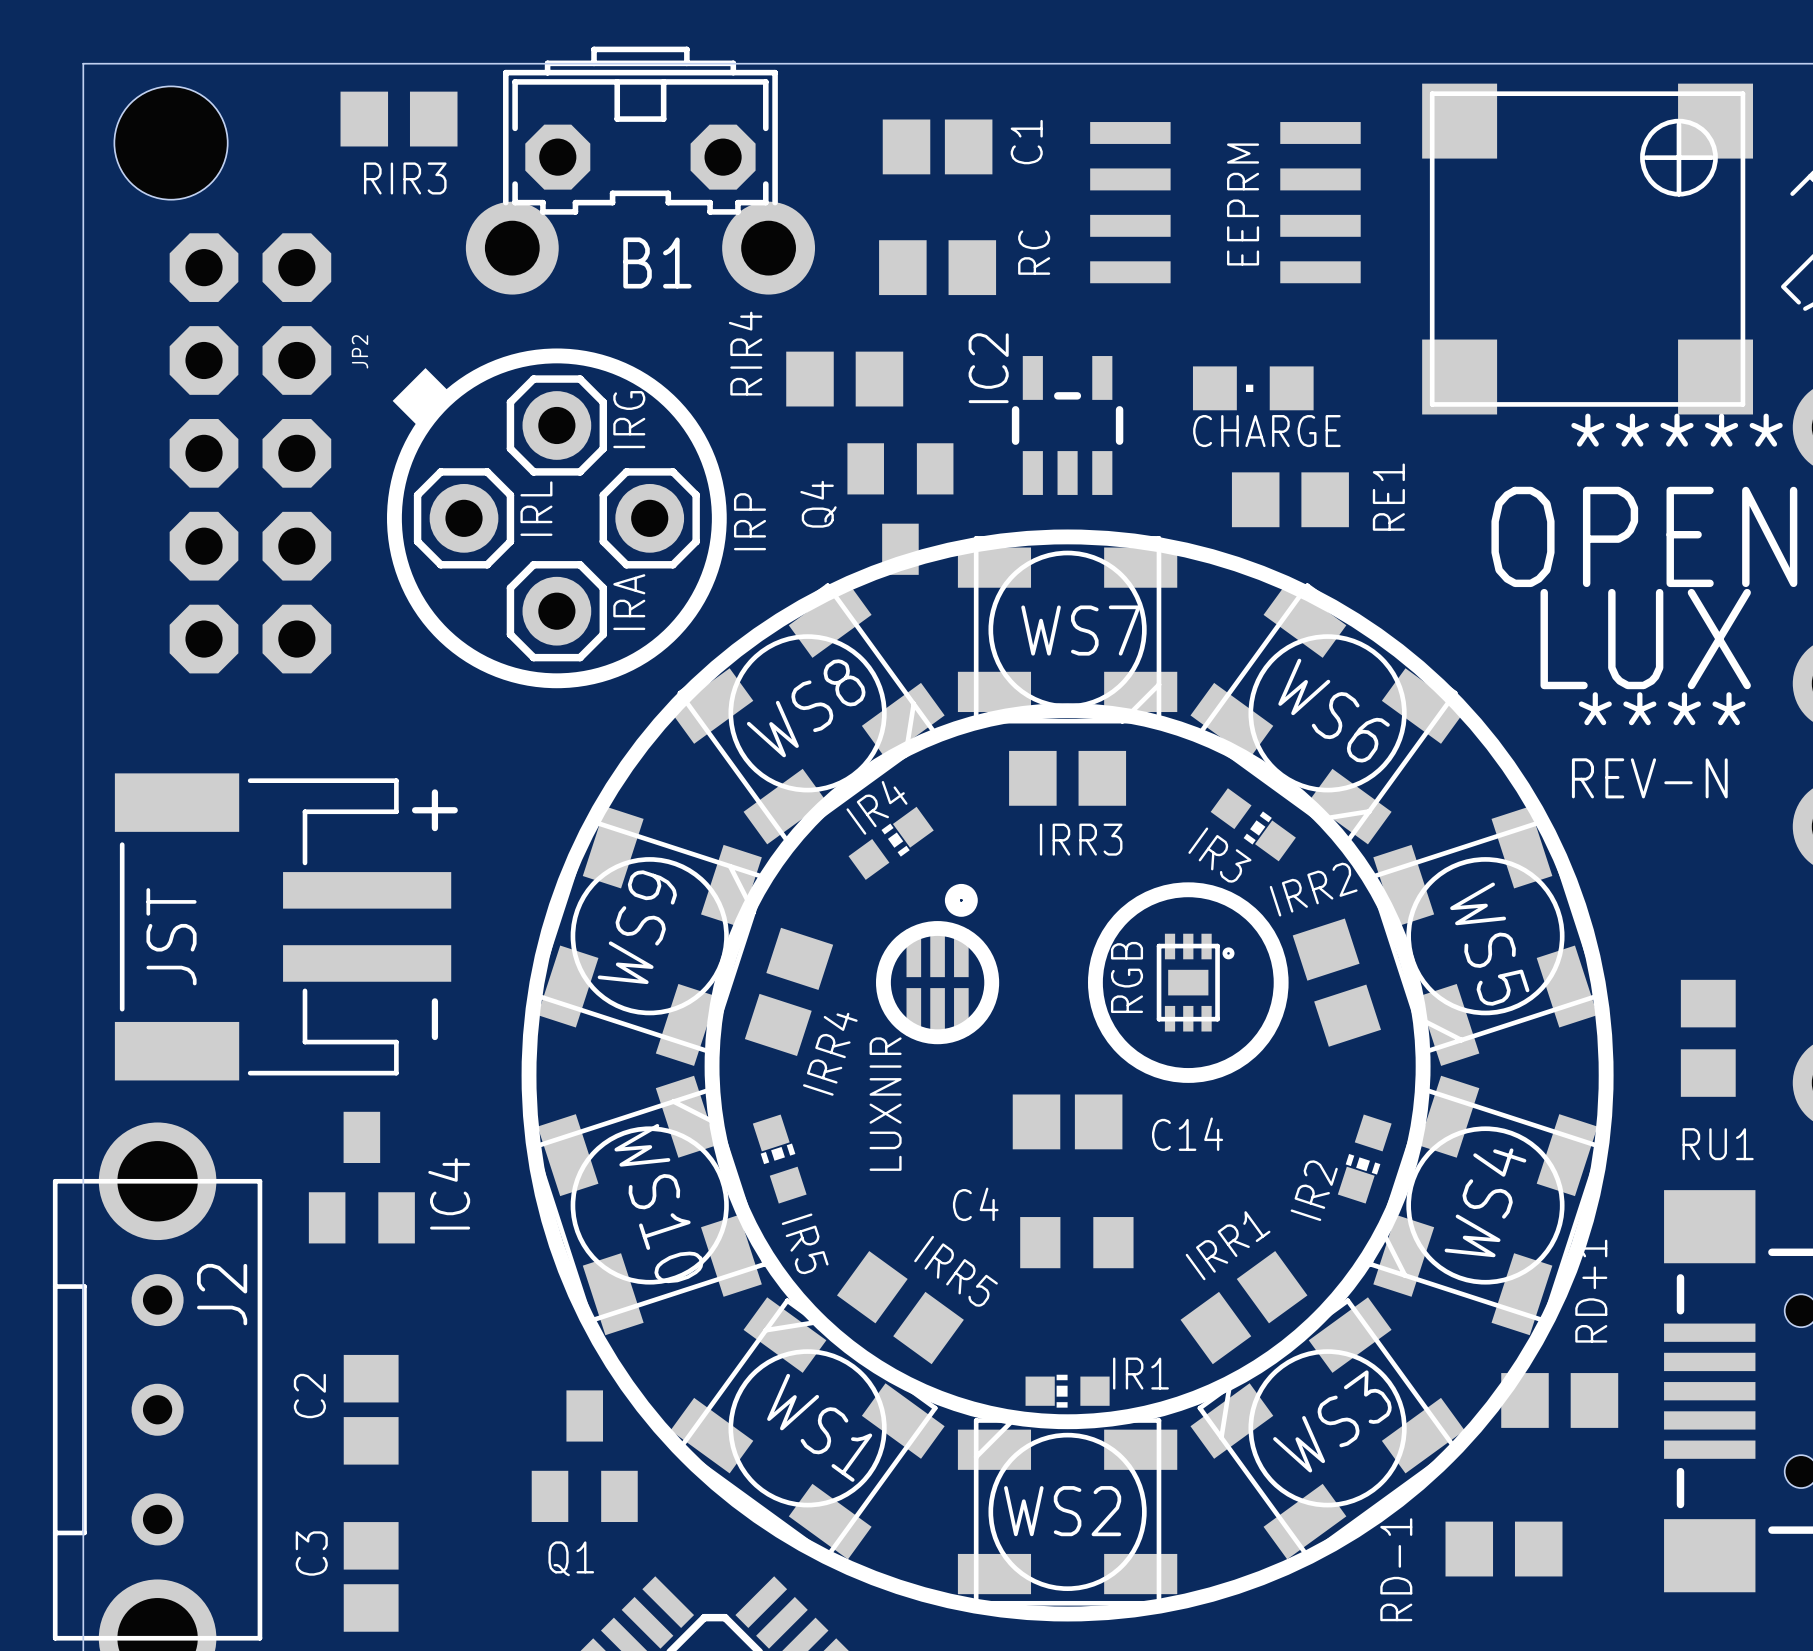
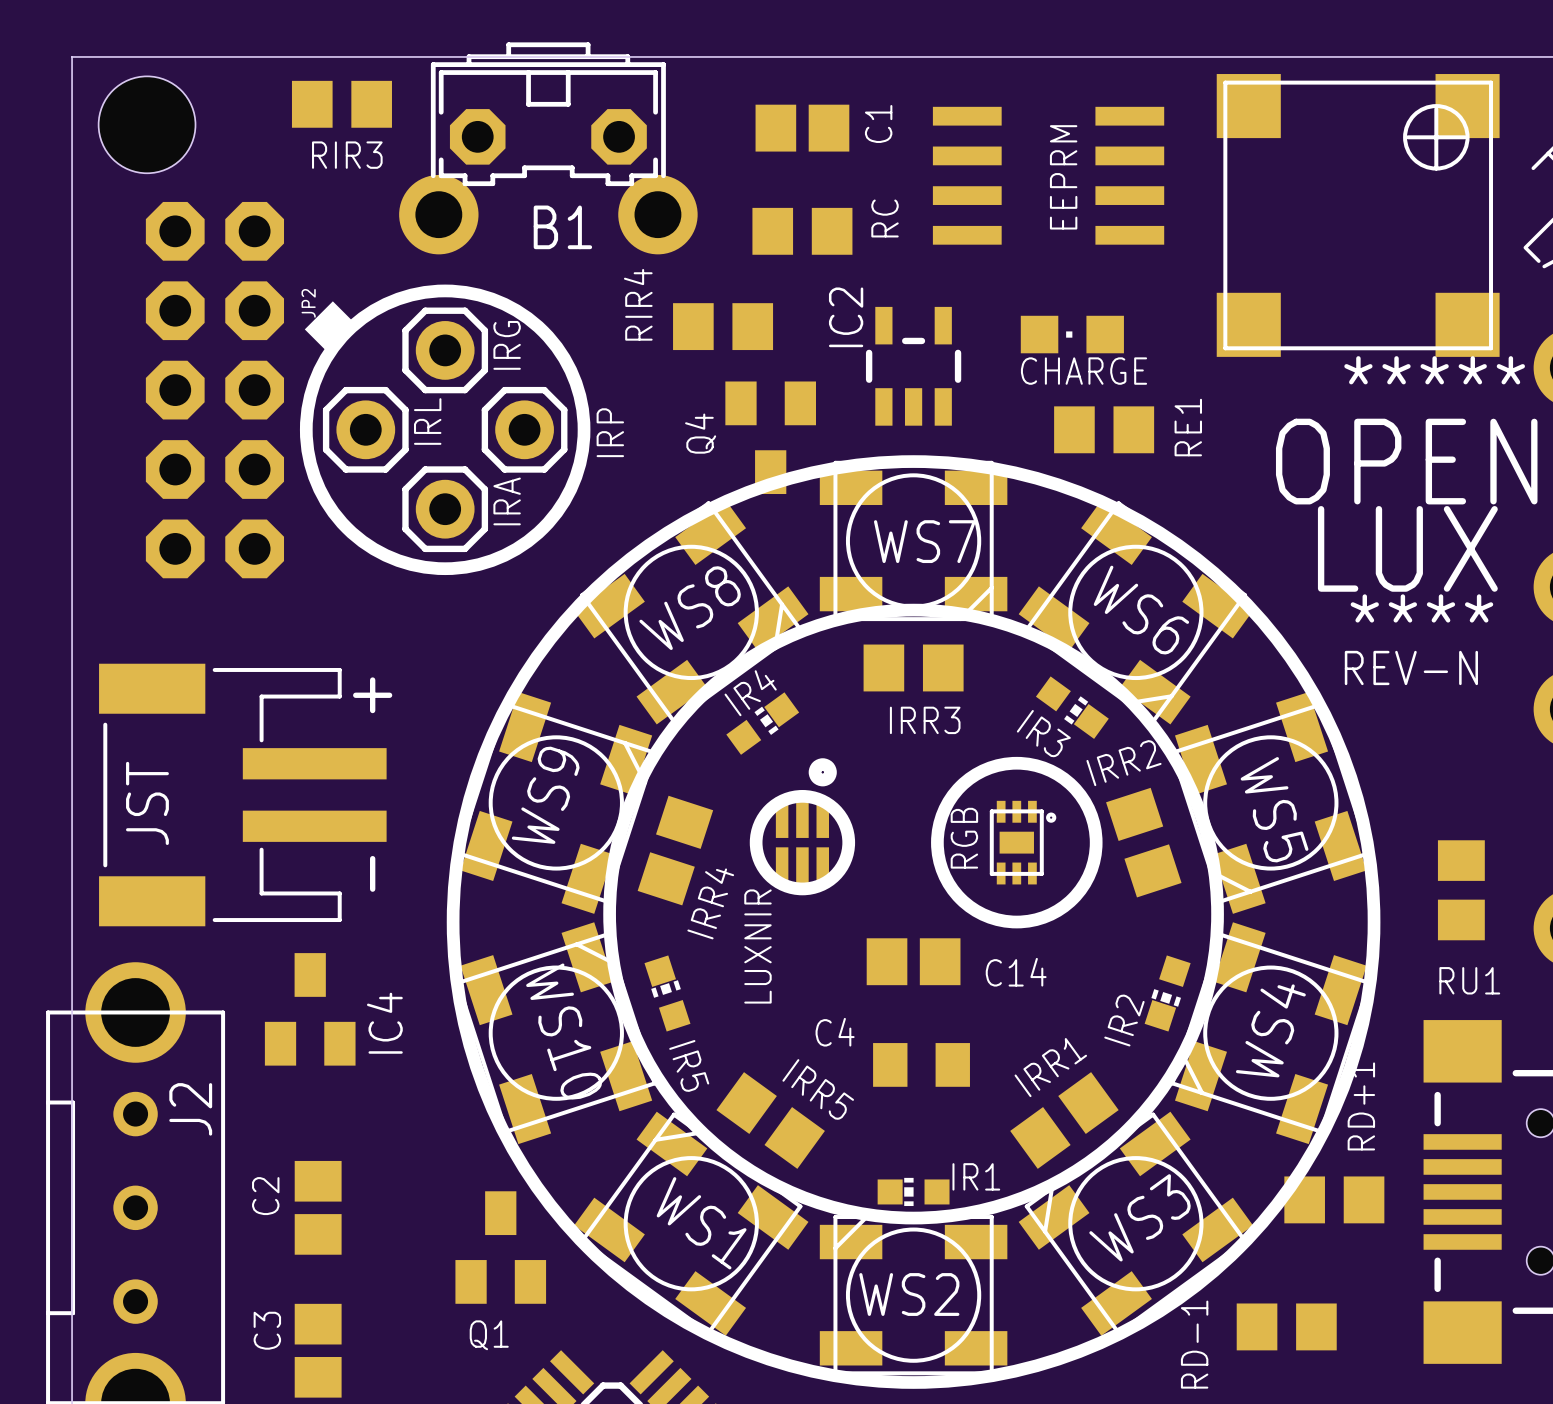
drawing position: (422, 397) -> (330, 326)
IRG position: (556, 425) -> (445, 350)
IRL position: (464, 518) -> (365, 429)
drawing position: (556, 518) -> (445, 429)
IRP position: (649, 518) -> (524, 429)
IRA position: (556, 611) -> (445, 509)

